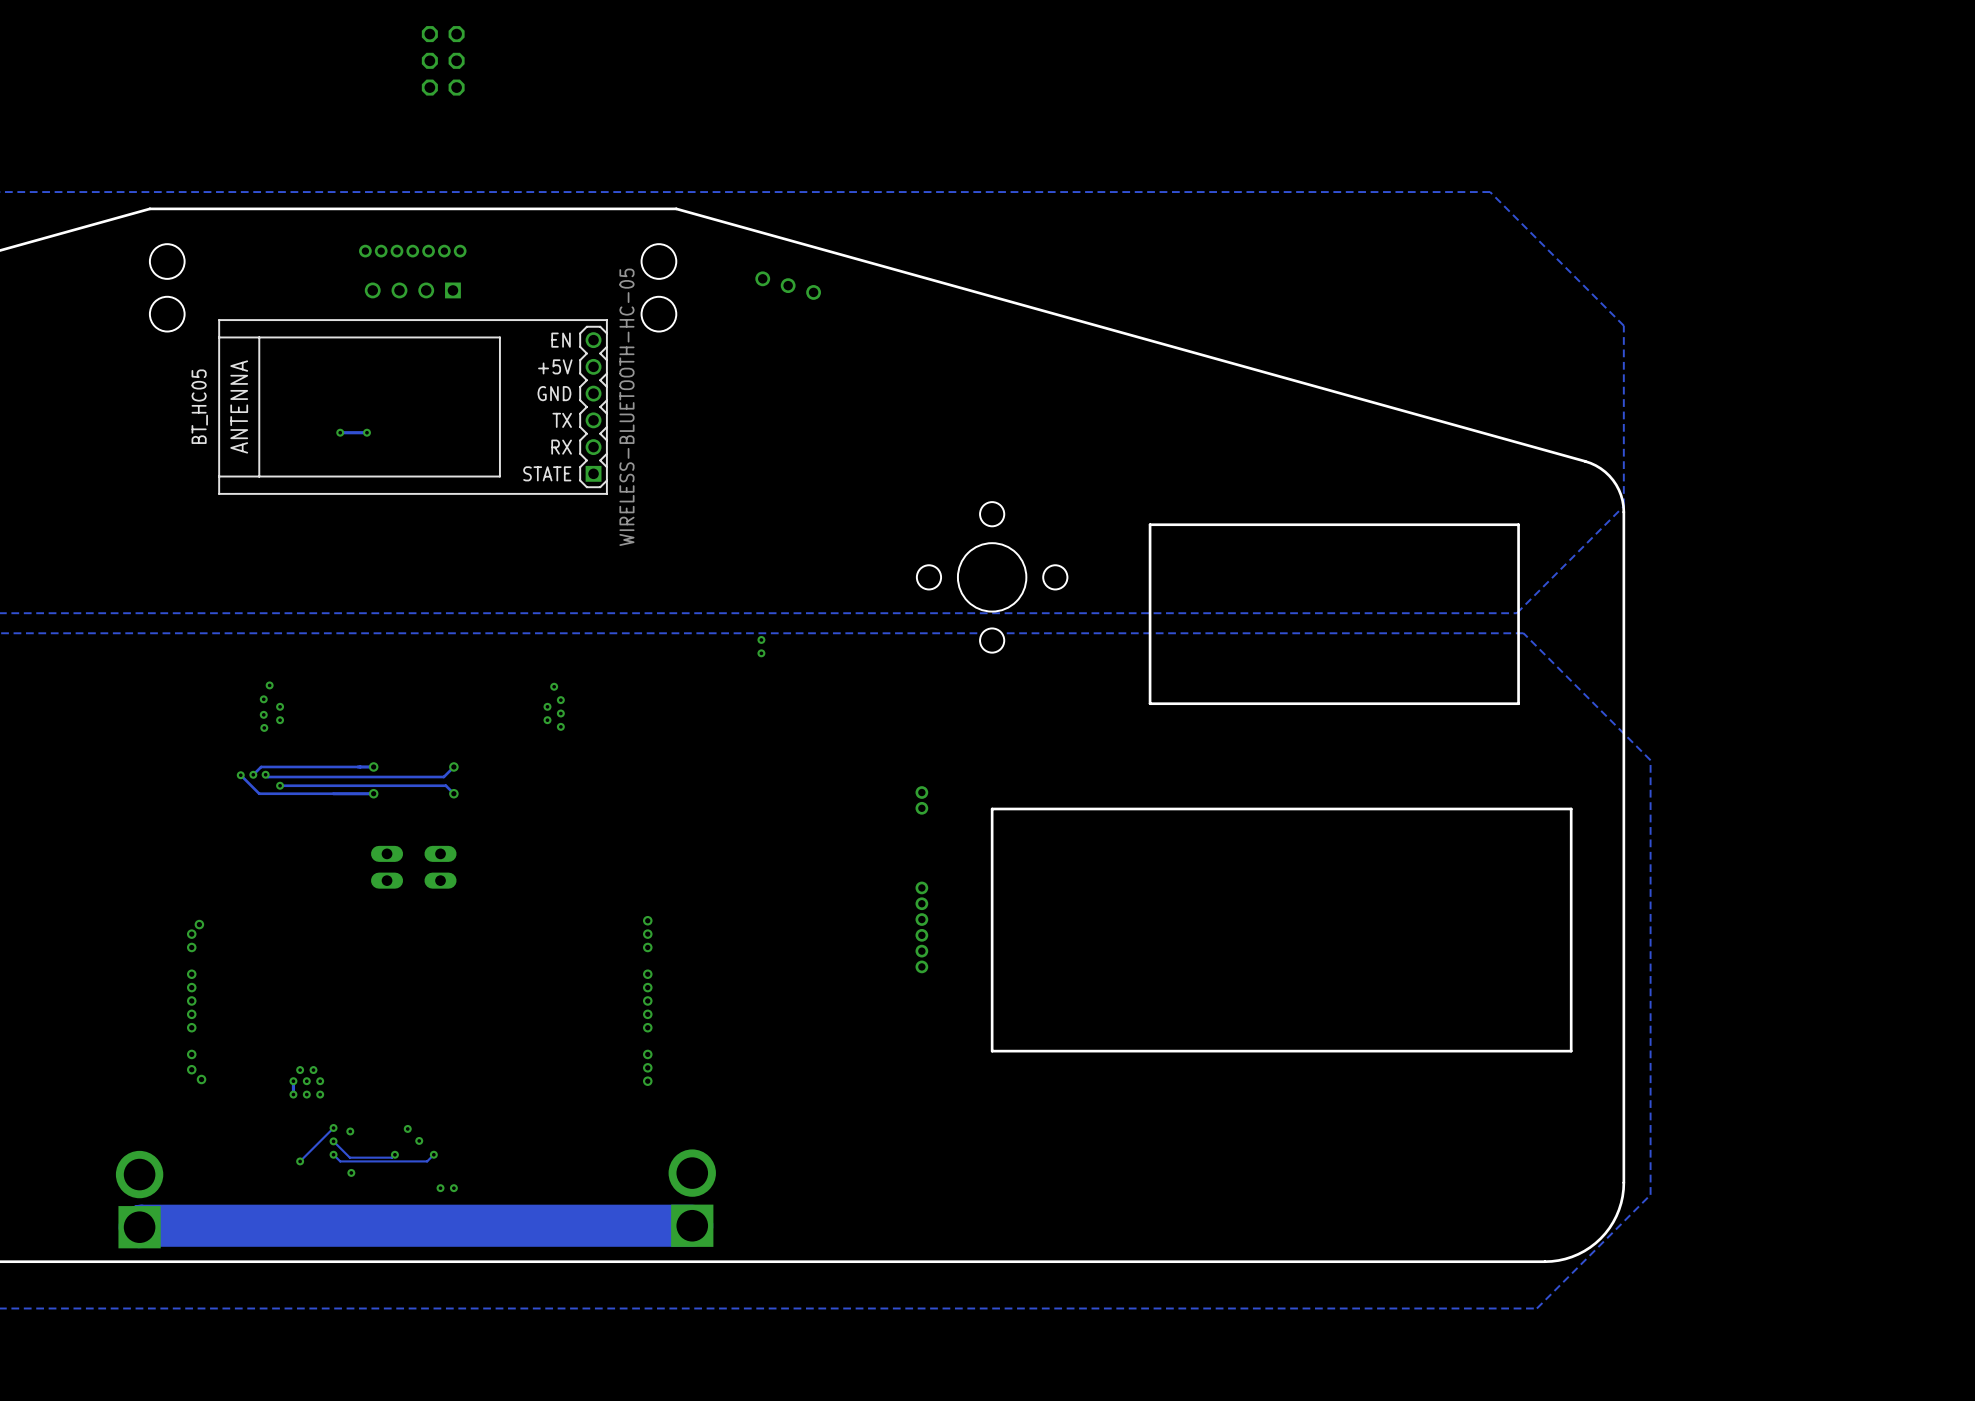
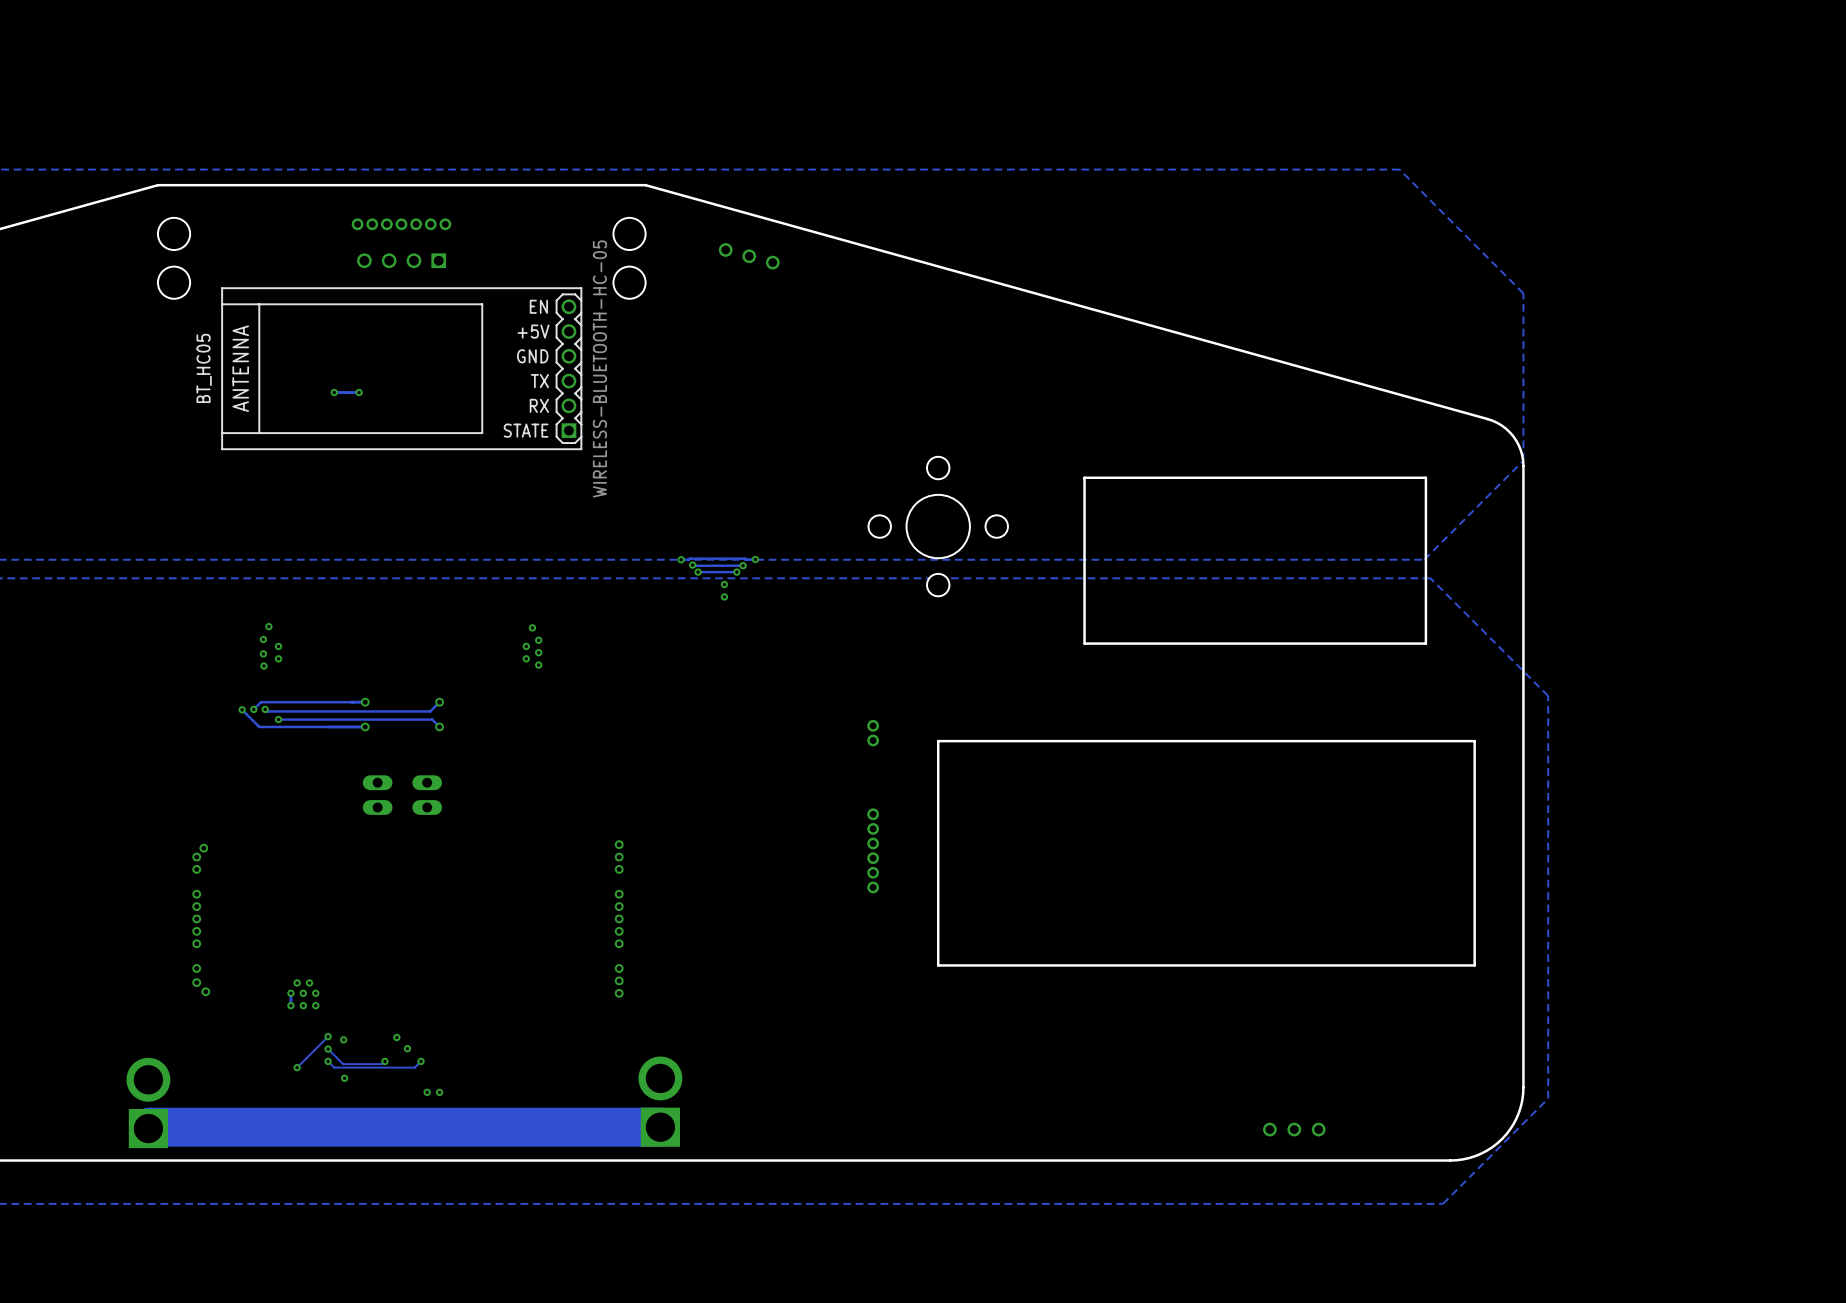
part: (443, 60) -> none
track: none -> (755, 559) (681, 559)
via: none -> (755, 559)
via: none -> (681, 559)
track: none -> (692, 565) (743, 565)
via: none -> (692, 565)
via: none -> (743, 565)
via: none -> (698, 572)
track: none -> (736, 572) (698, 572)
via: none -> (736, 572)
part: none -> (1294, 1129)

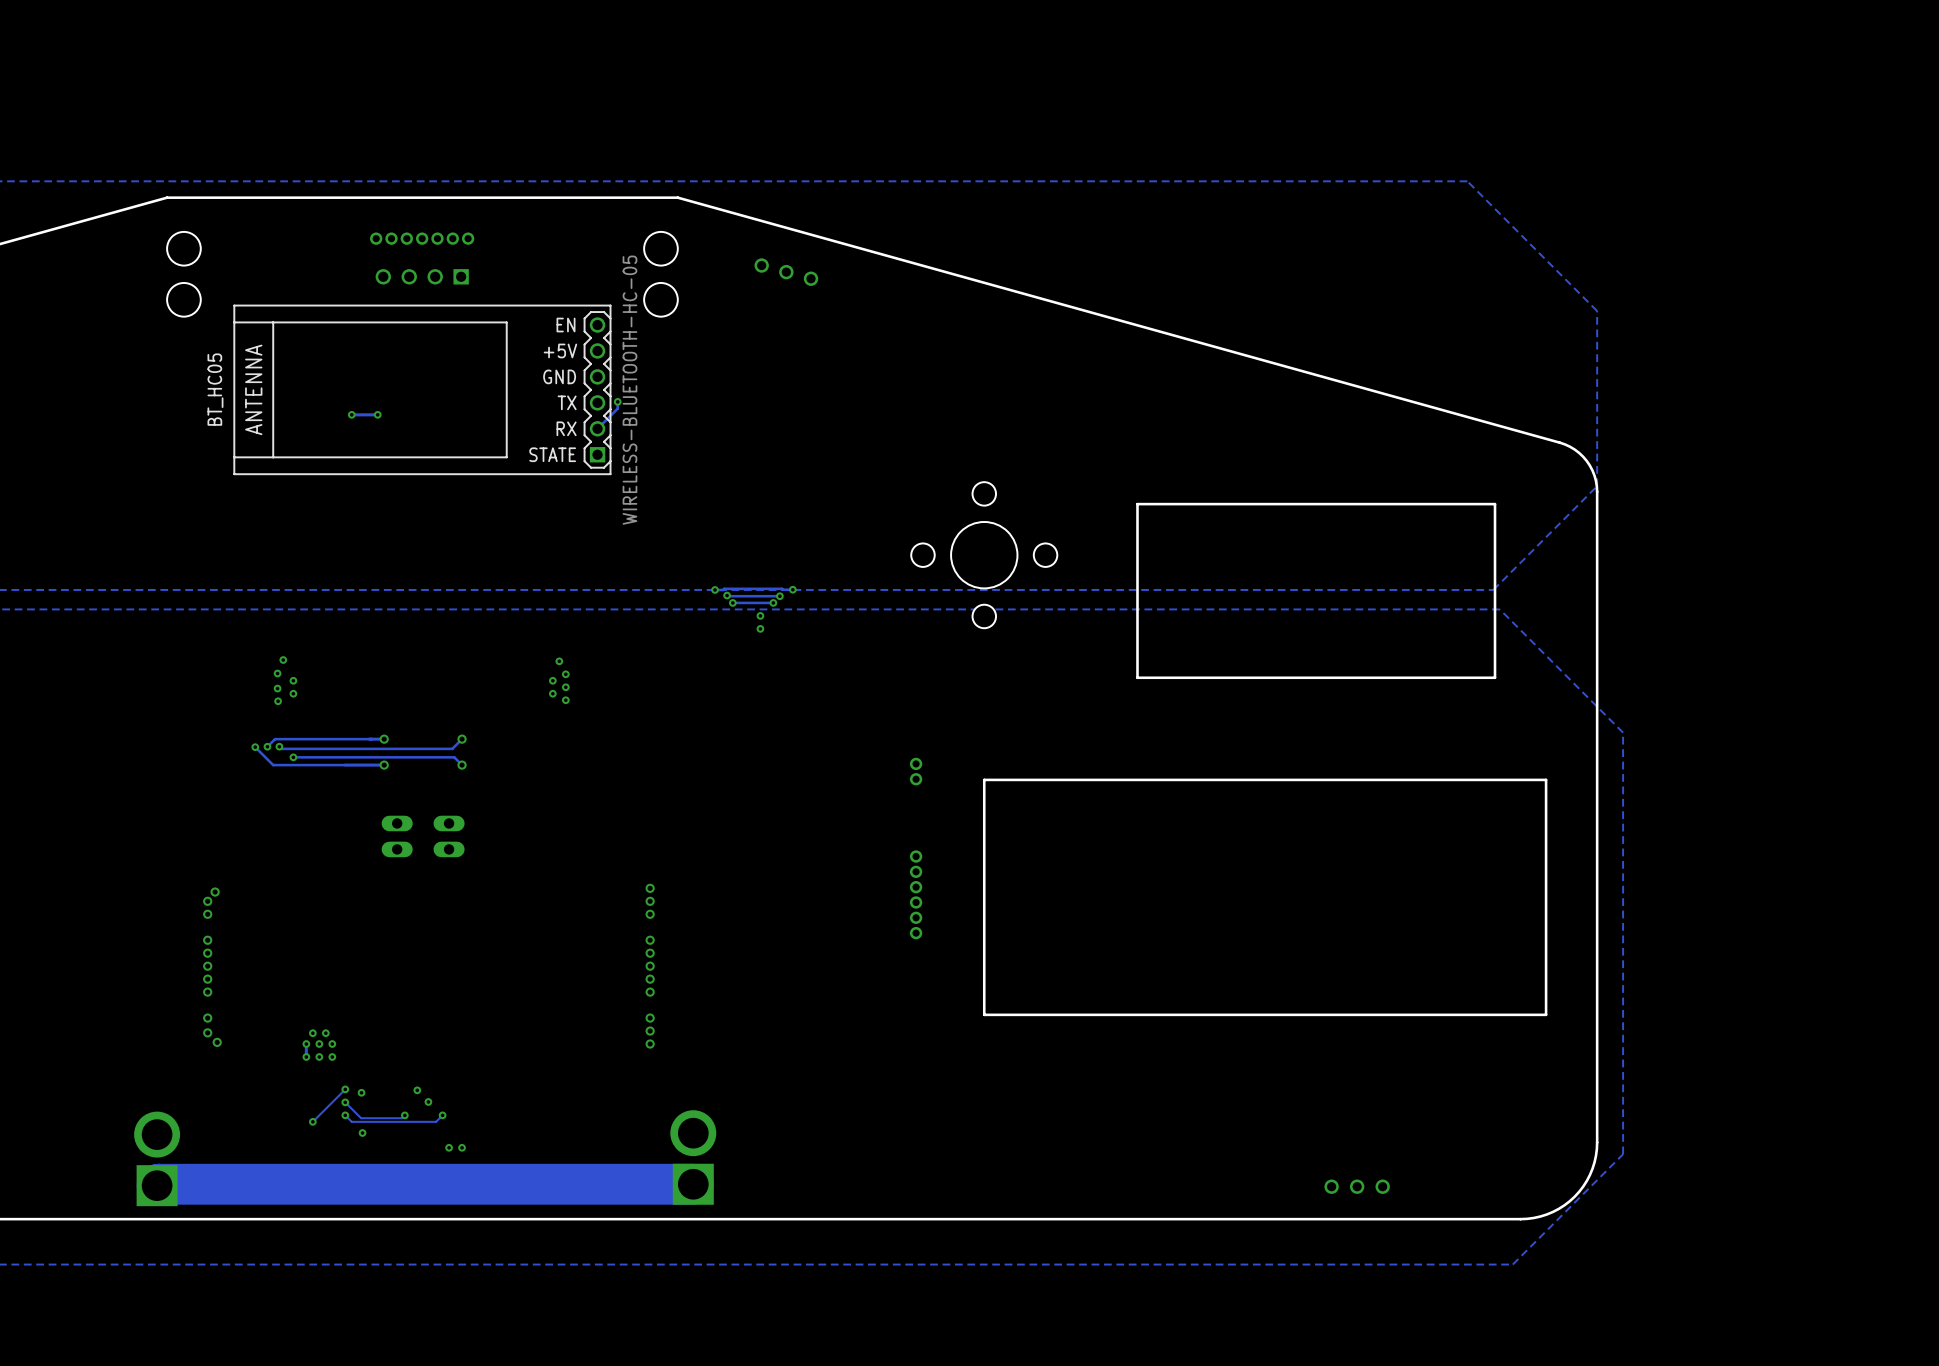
track: none -> (617, 401) (617, 408) (597, 428)
via: none -> (617, 401)

